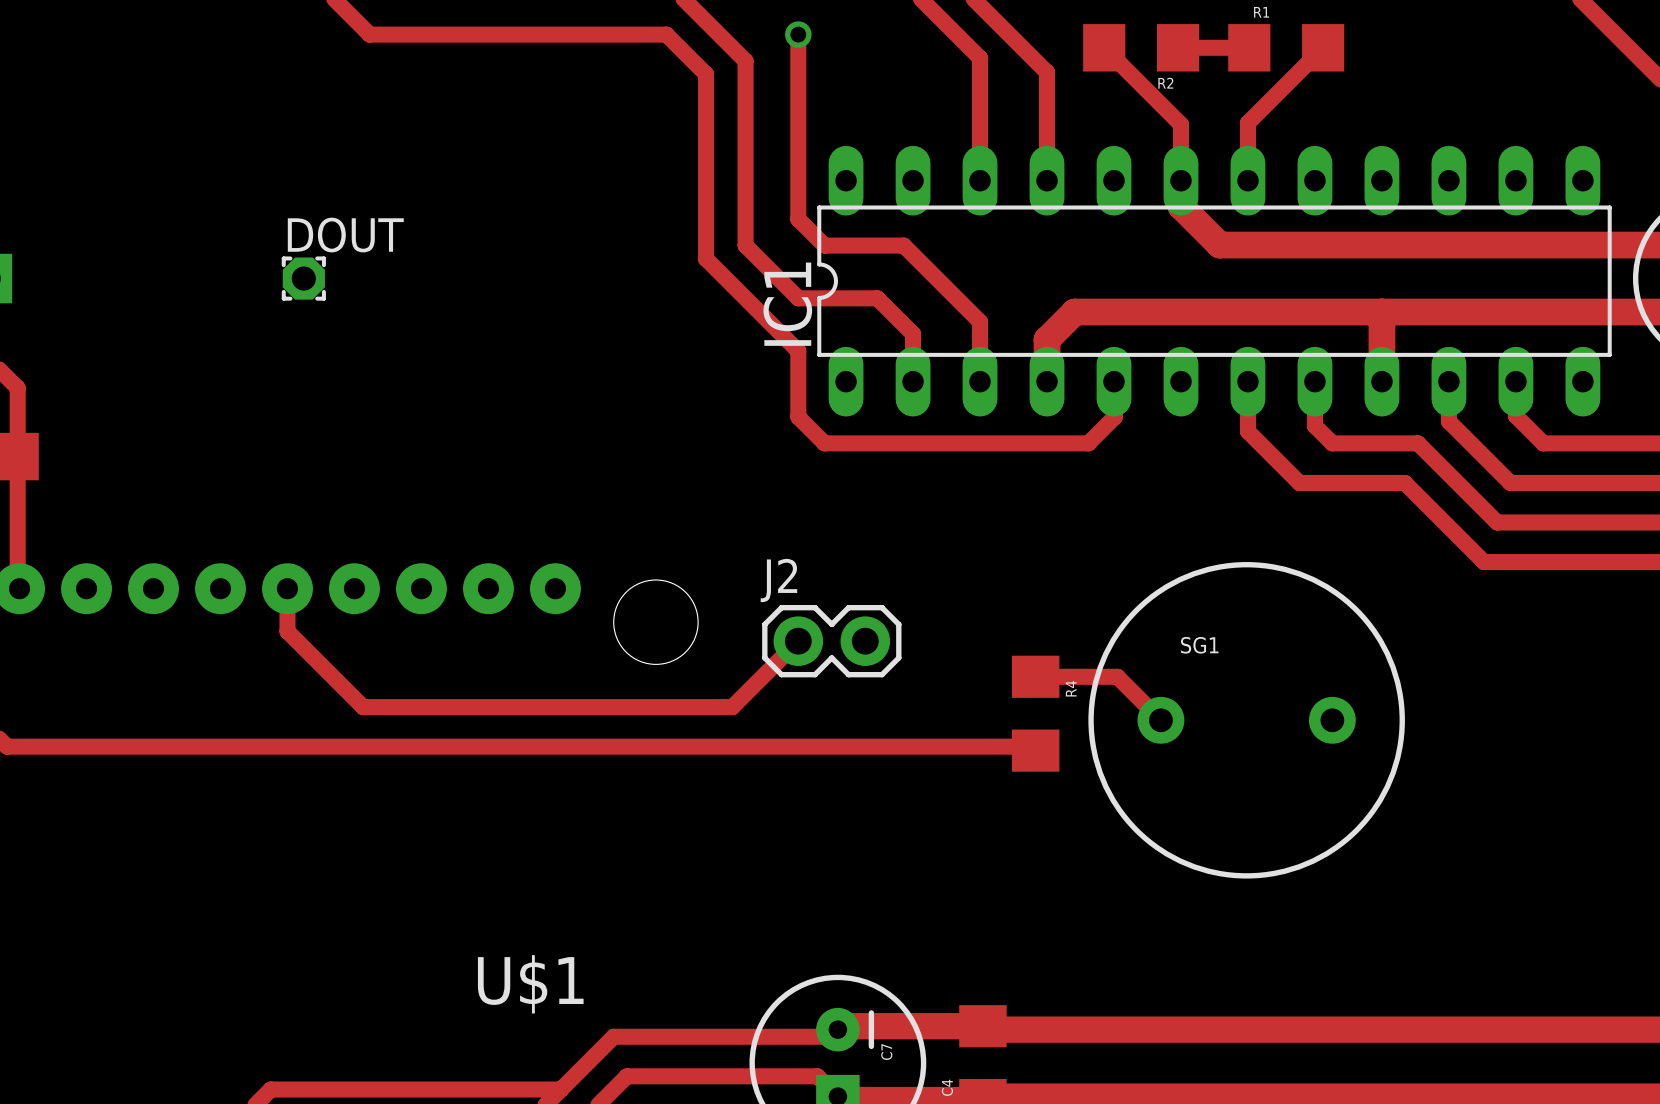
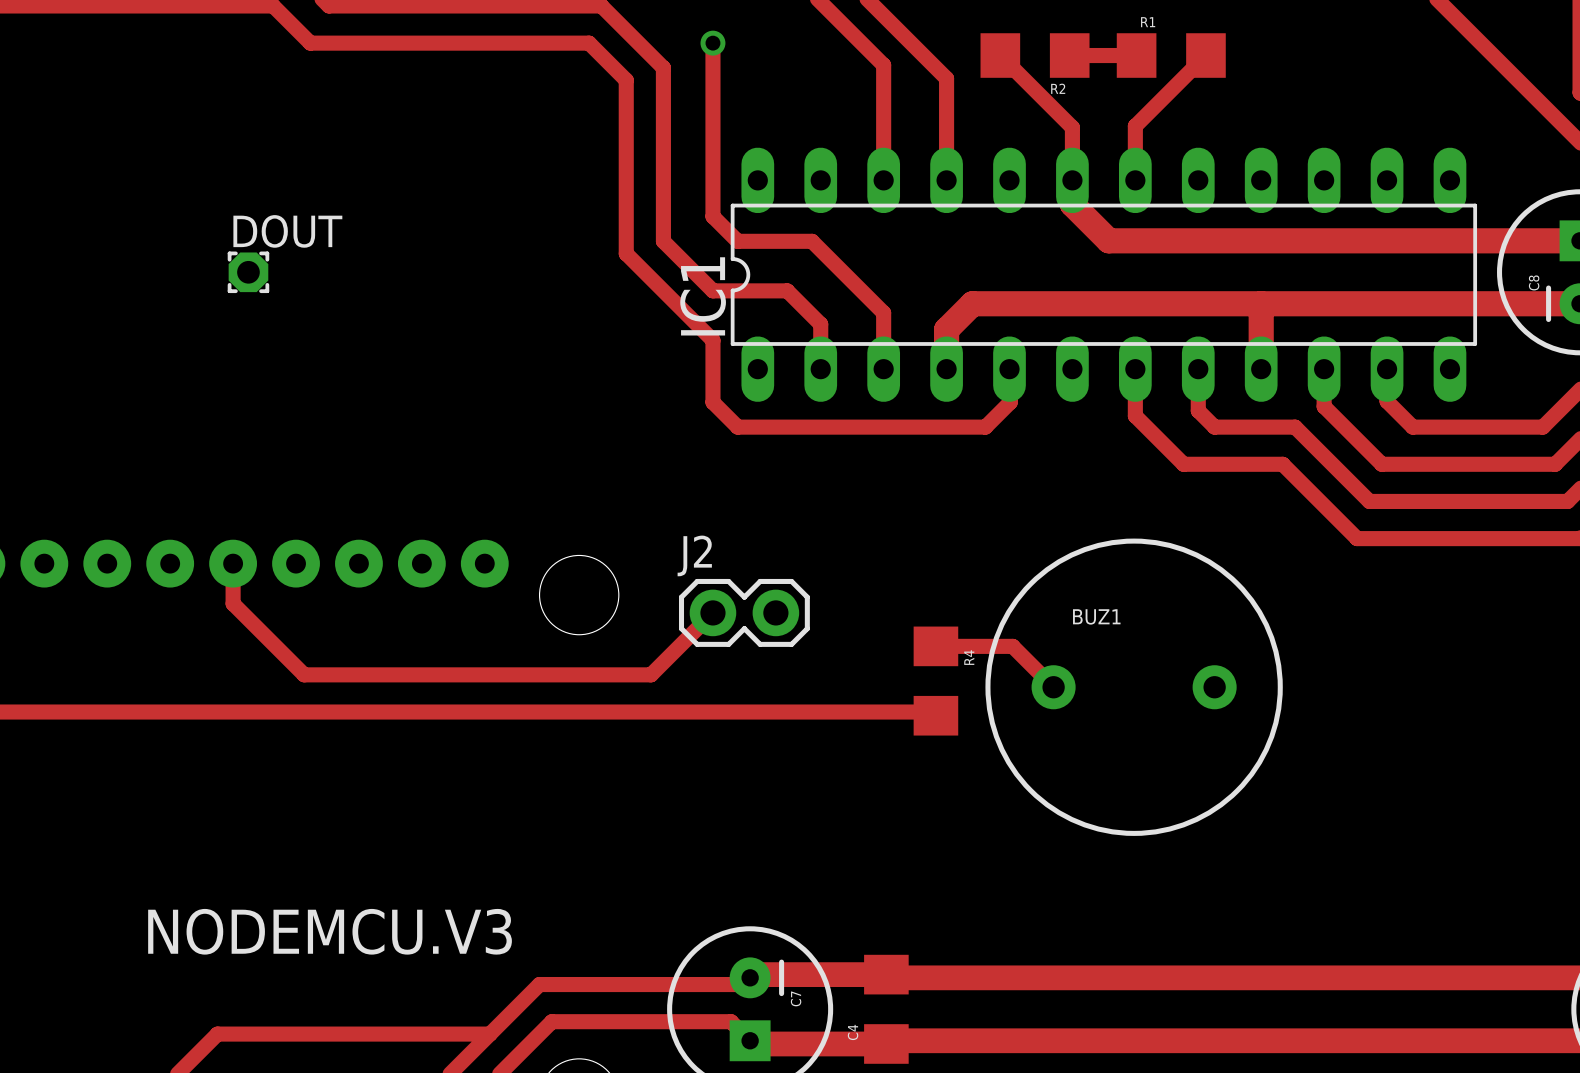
SG1 name: SG1 (1199, 645) -> BUZ1 (1096, 616)
U$1 name: U$1 (530, 984) -> NODEMCU.V3 (330, 931)

